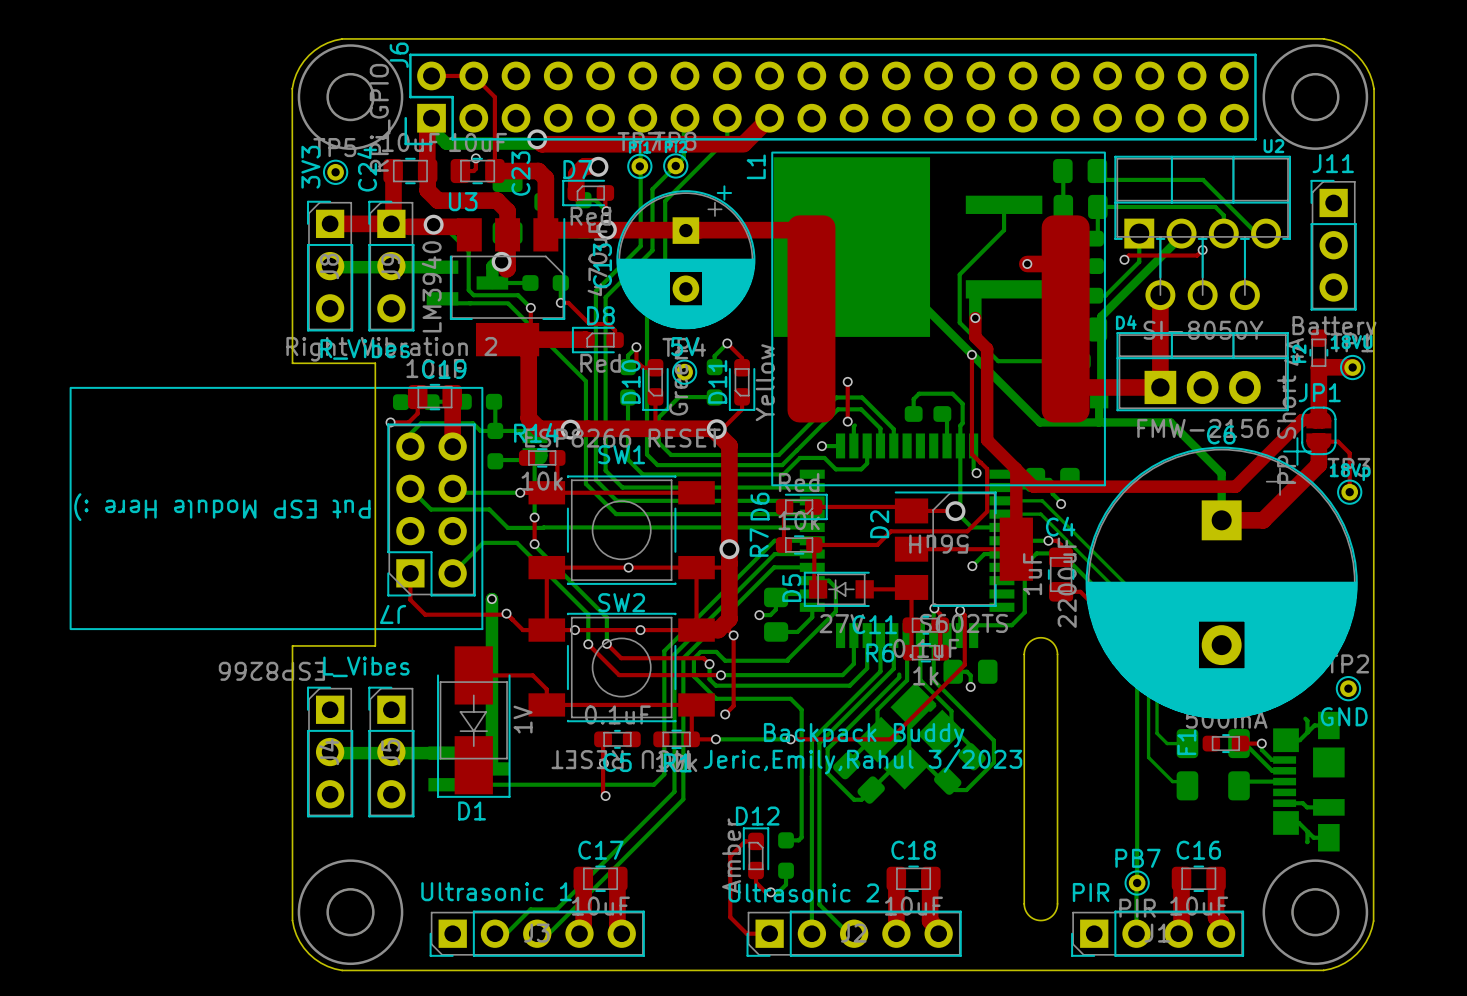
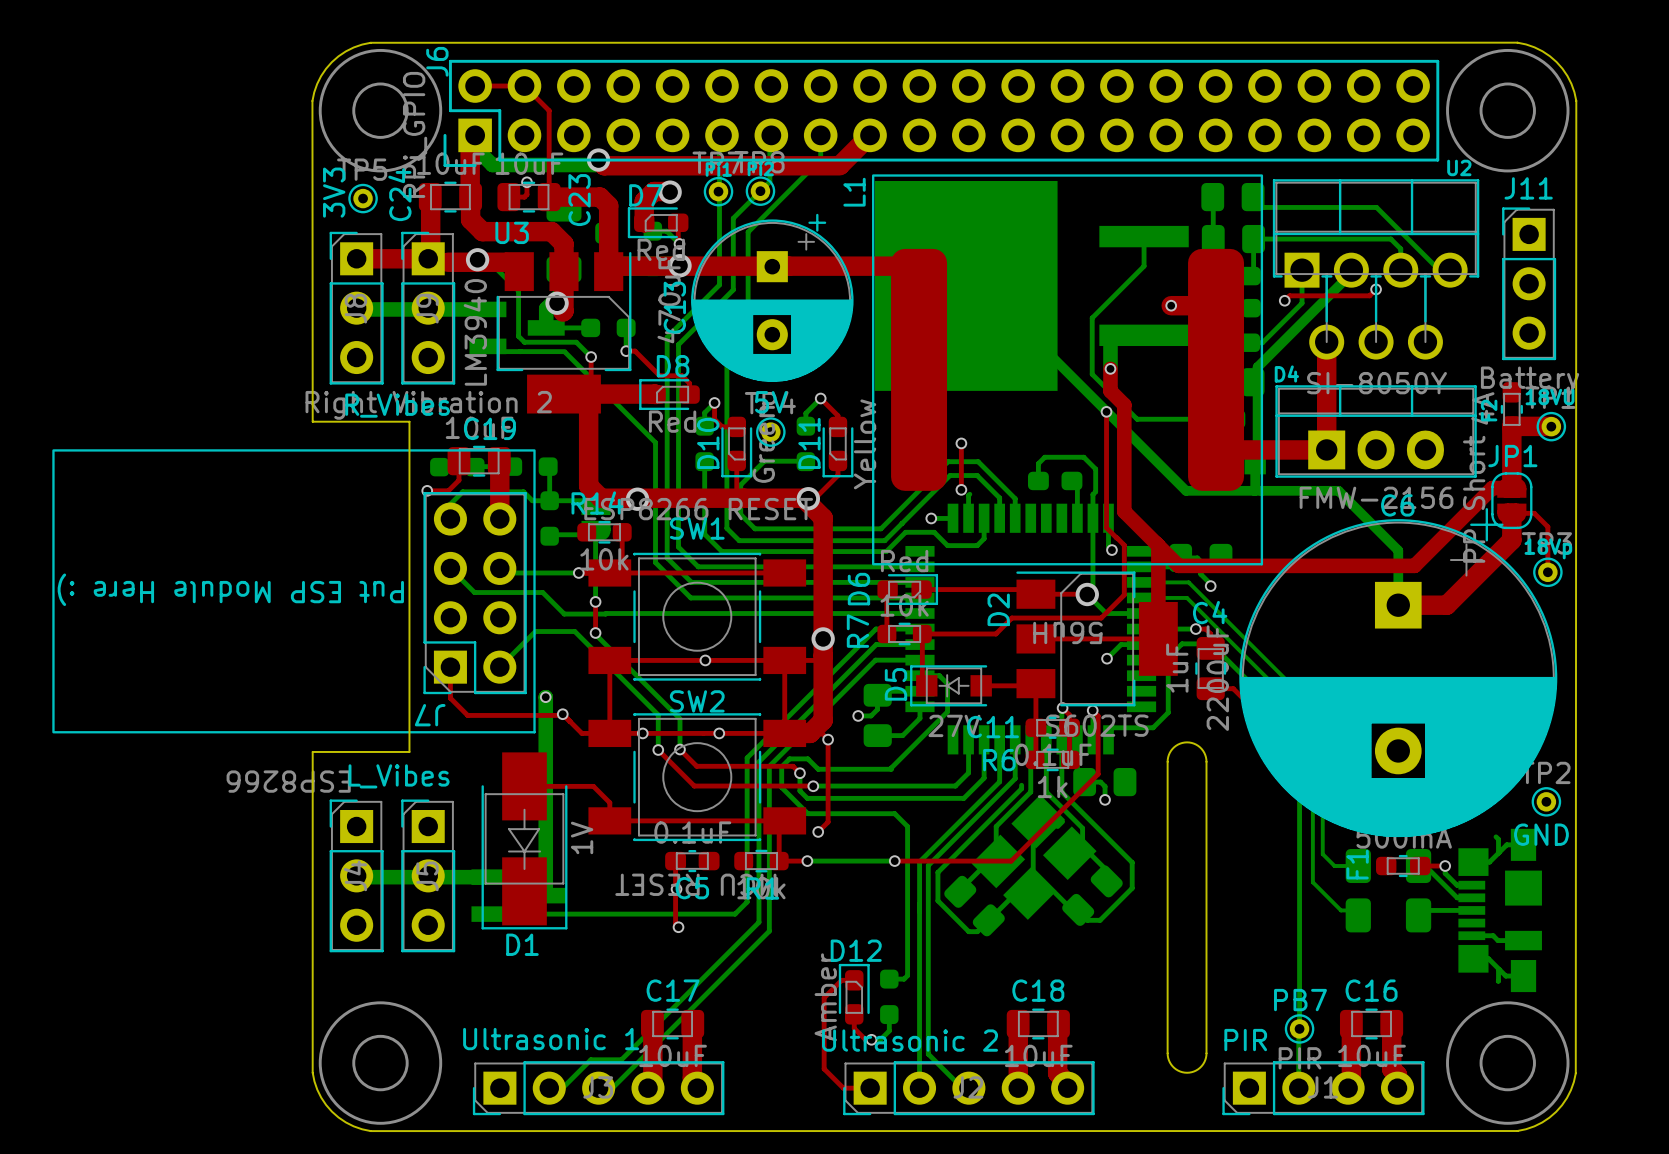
text: Backpack Buddy (864, 735) -> none
text: Jeric,Emily,Rahul 3/2023 (862, 761) -> none

